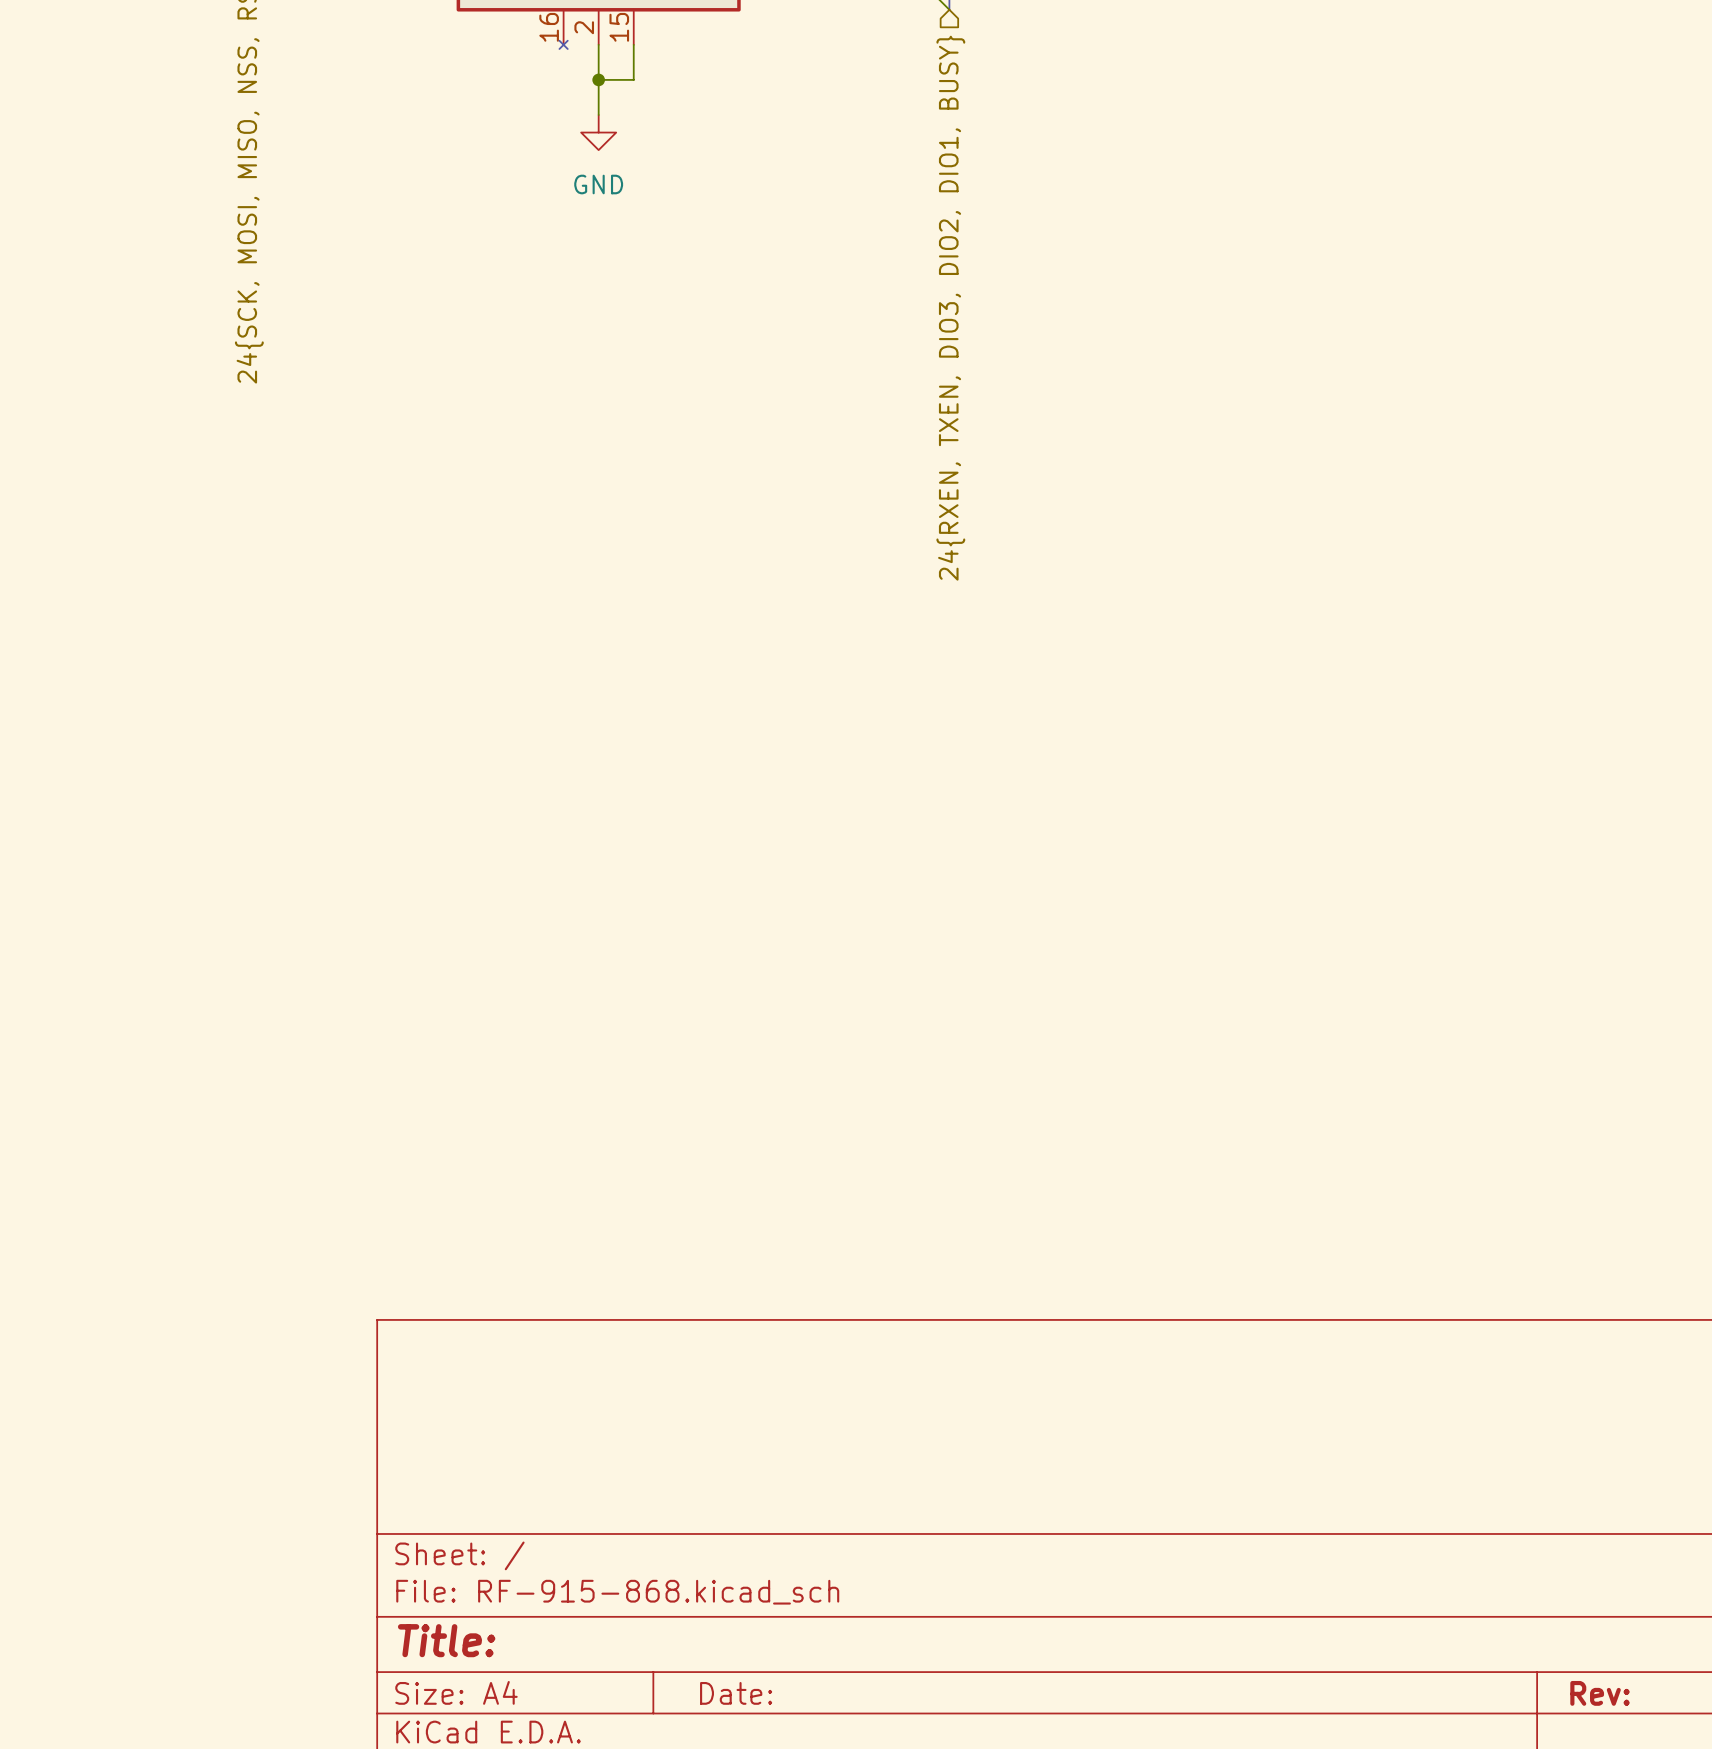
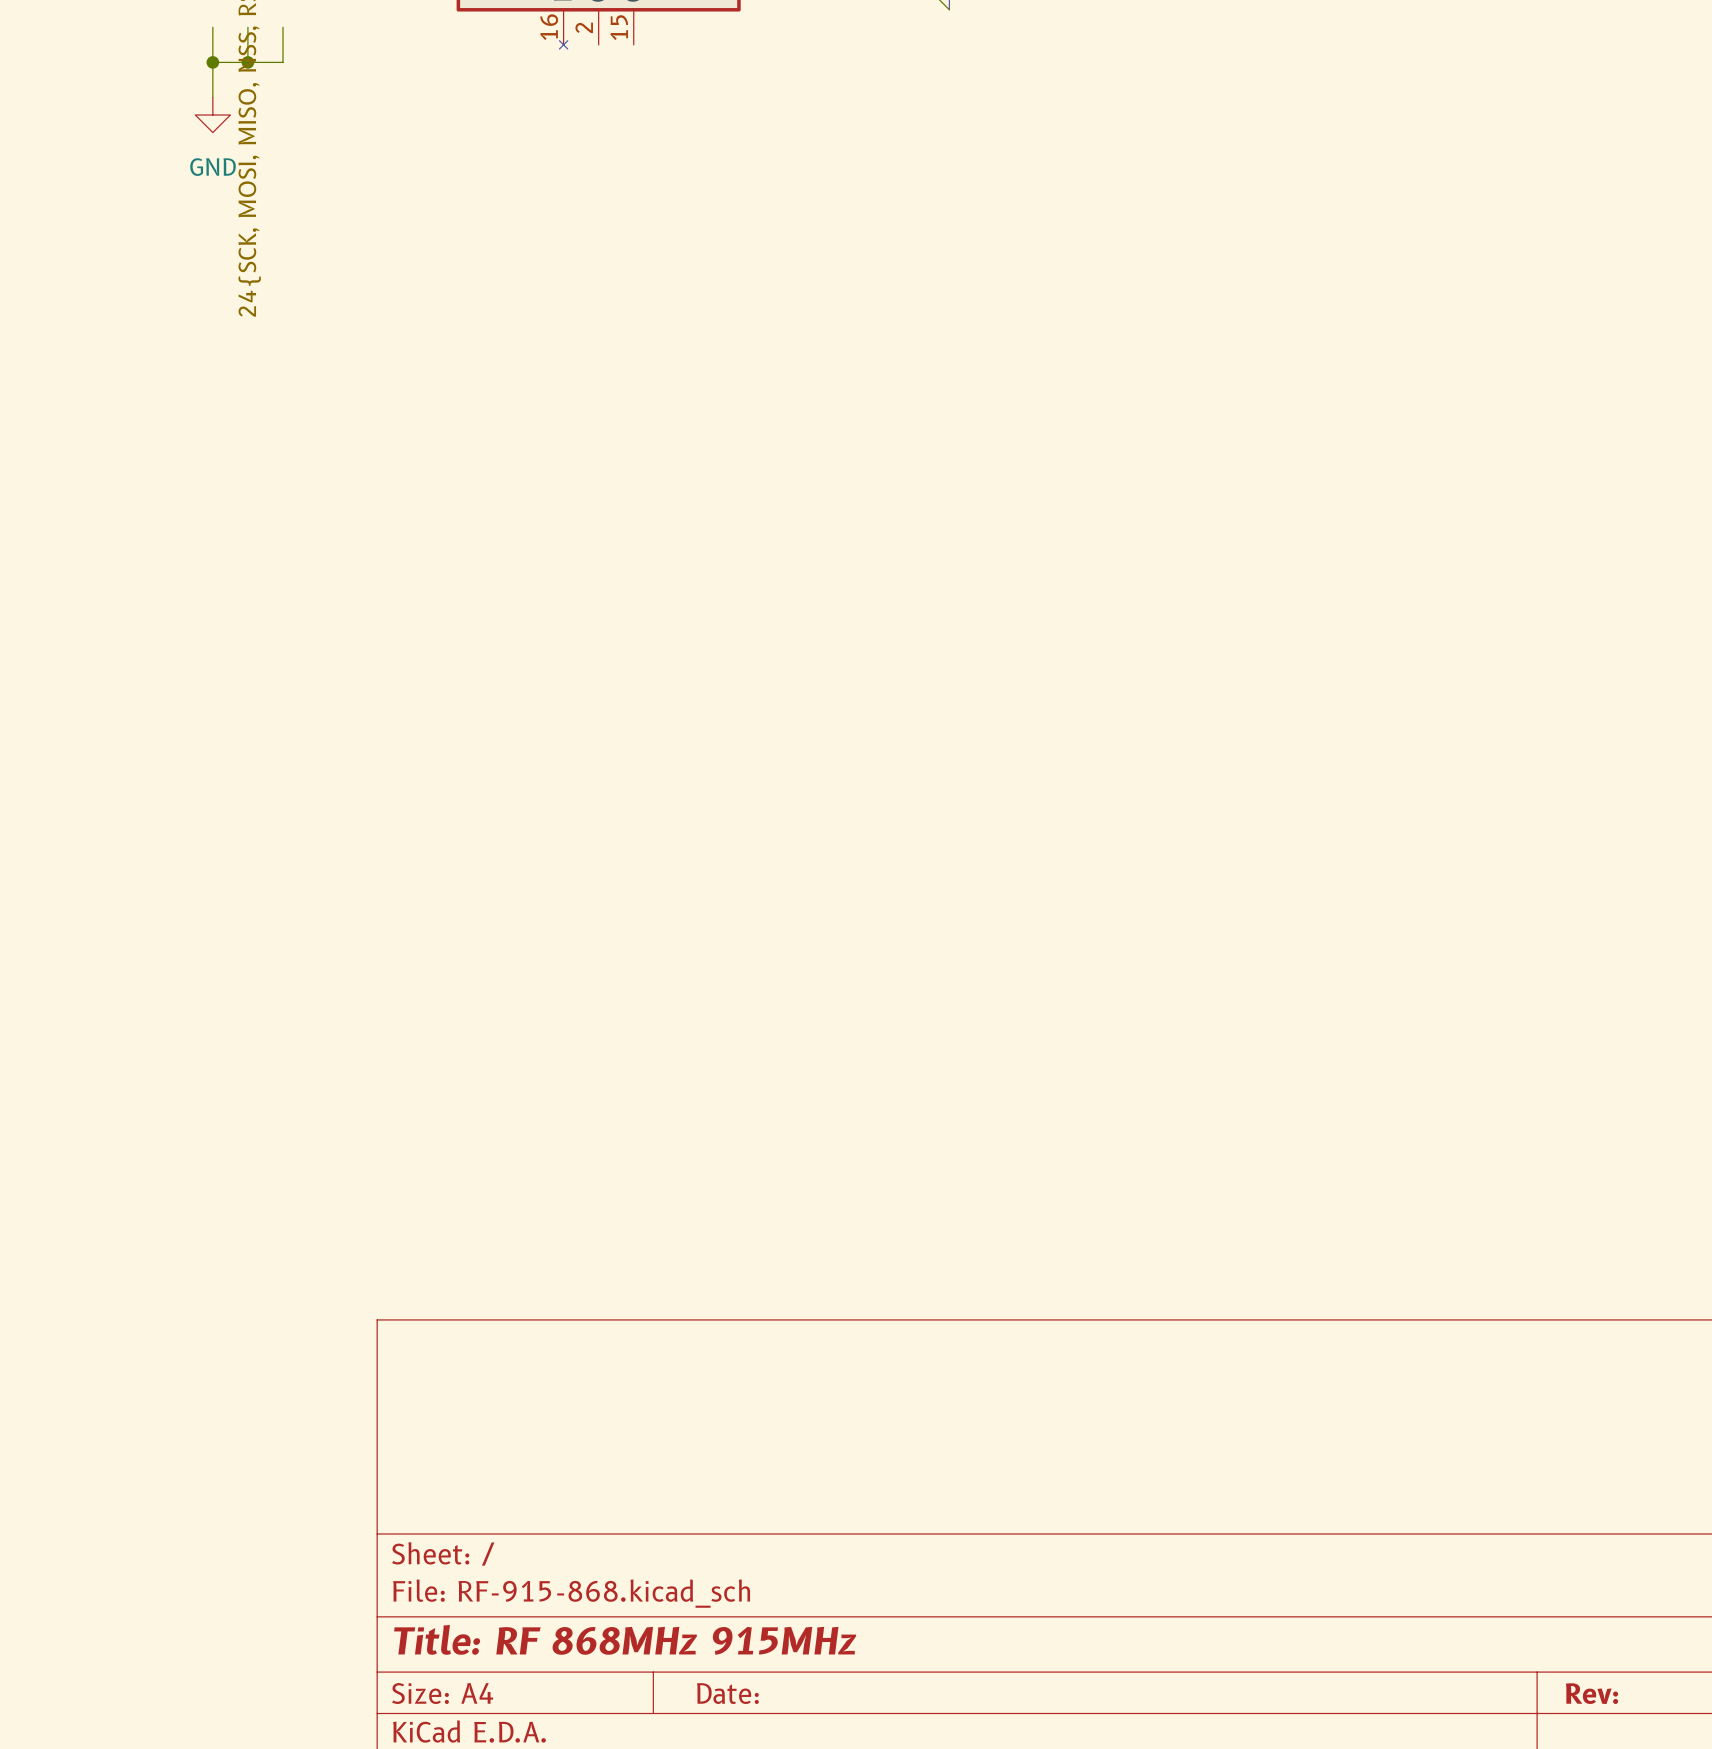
wire: none -> (212, 27) (212, 97)
wire: none -> (247, 27) (247, 62)
wire: none -> (283, 27) (283, 62) (212, 62)
wire: (598, 44) (598, 115) -> none
wire: (633, 44) (633, 79) (598, 79) -> none
junction: none -> (212, 62)
junction: none -> (247, 62)
junction: (598, 79) -> none
power symbol: none -> GND (212, 115)
power symbol: GND (598, 132) -> none
hierarchical label: 24{RXEN, TXEN, DIO3, DIO2, DIO1, BUSY} (950, 308) -> none
title block: Title: (446, 1640) -> Title: RF 868MHz 915MHz (625, 1639)

